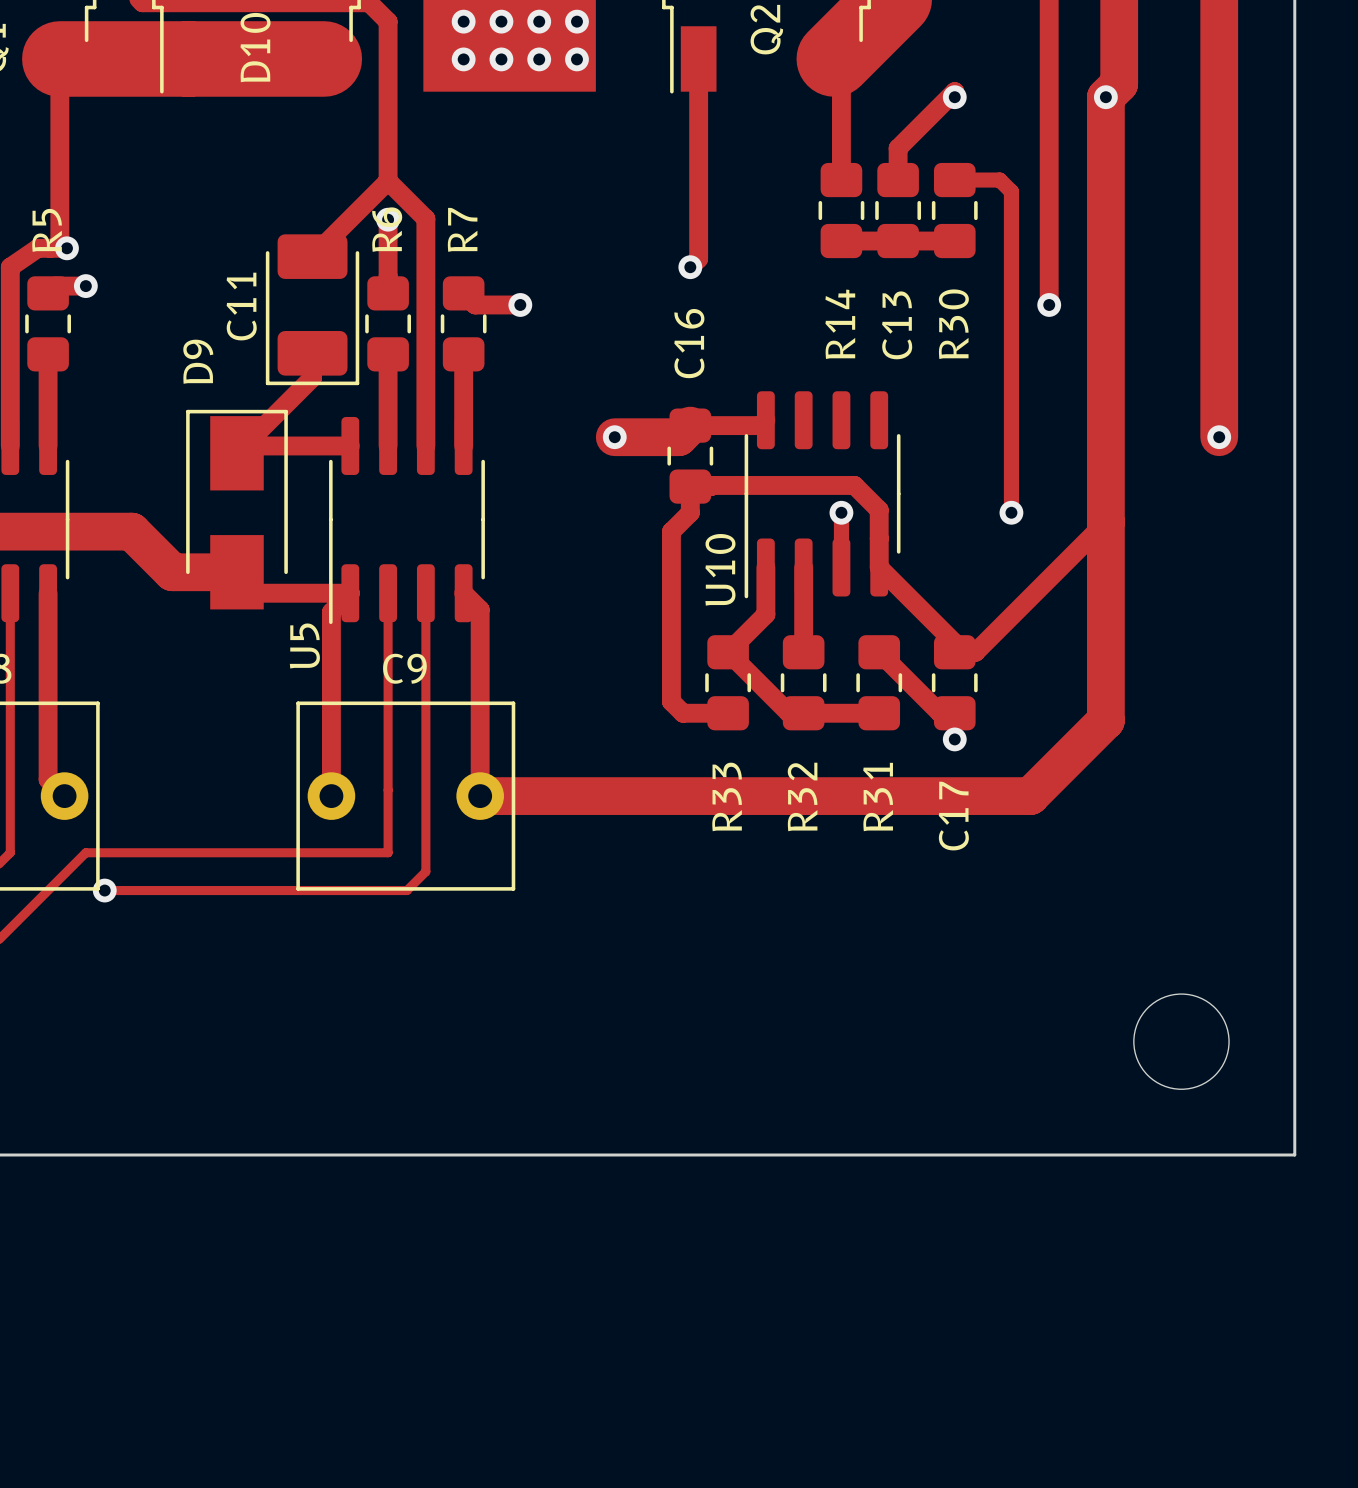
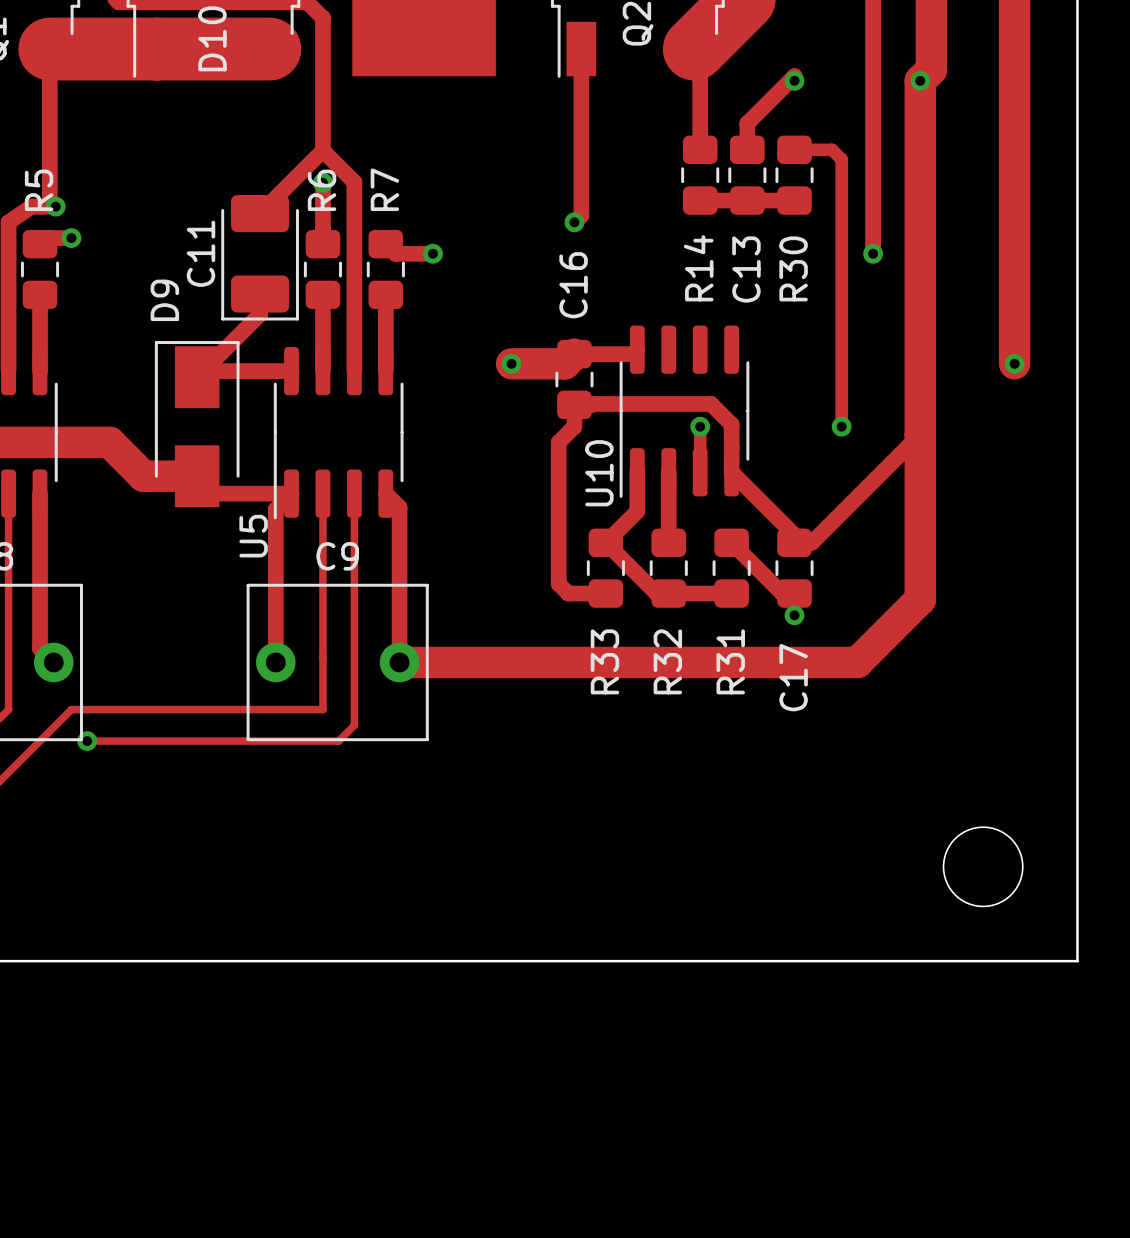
via: (463, 21) -> none
via: (501, 21) -> none
via: (539, 21) -> none
via: (576, 21) -> none
via: (463, 59) -> none
via: (501, 59) -> none
via: (539, 59) -> none
via: (576, 59) -> none

